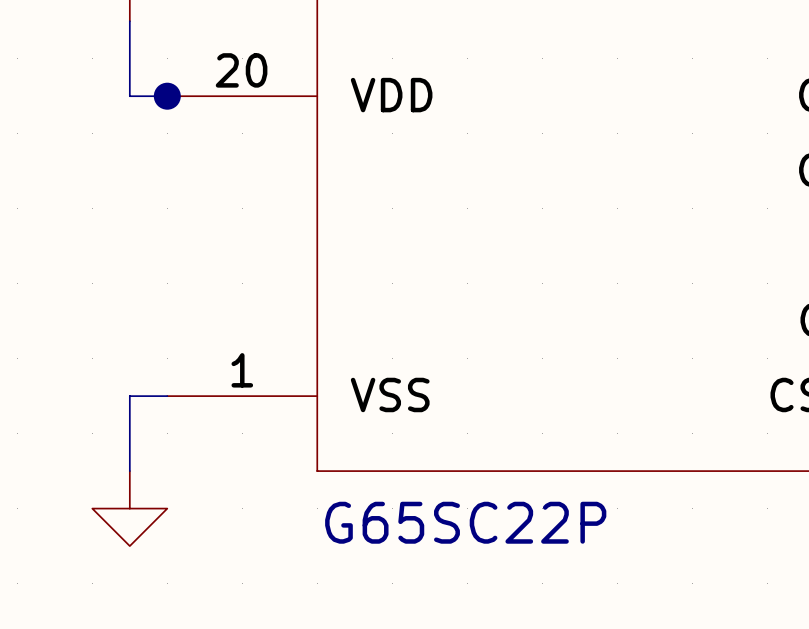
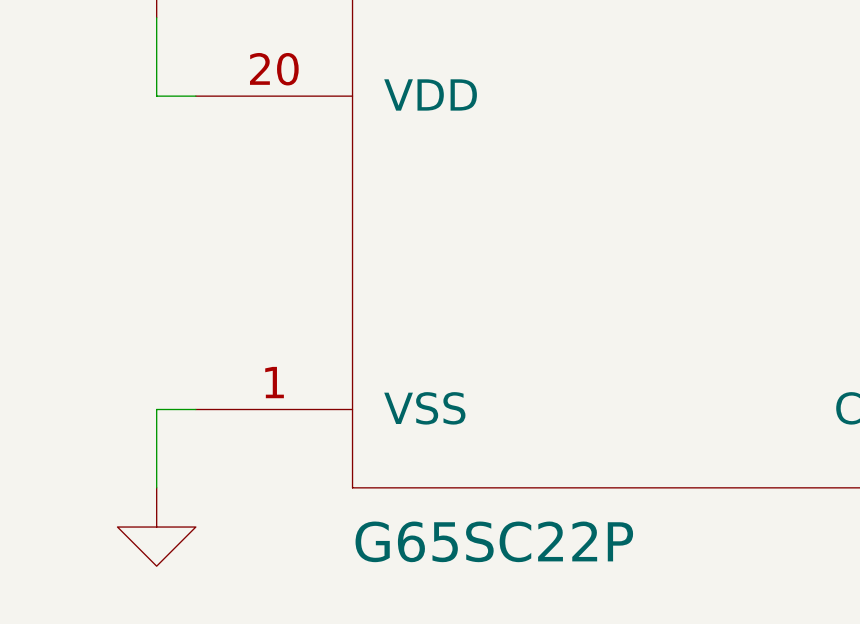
junction: (167, 96) -> none

